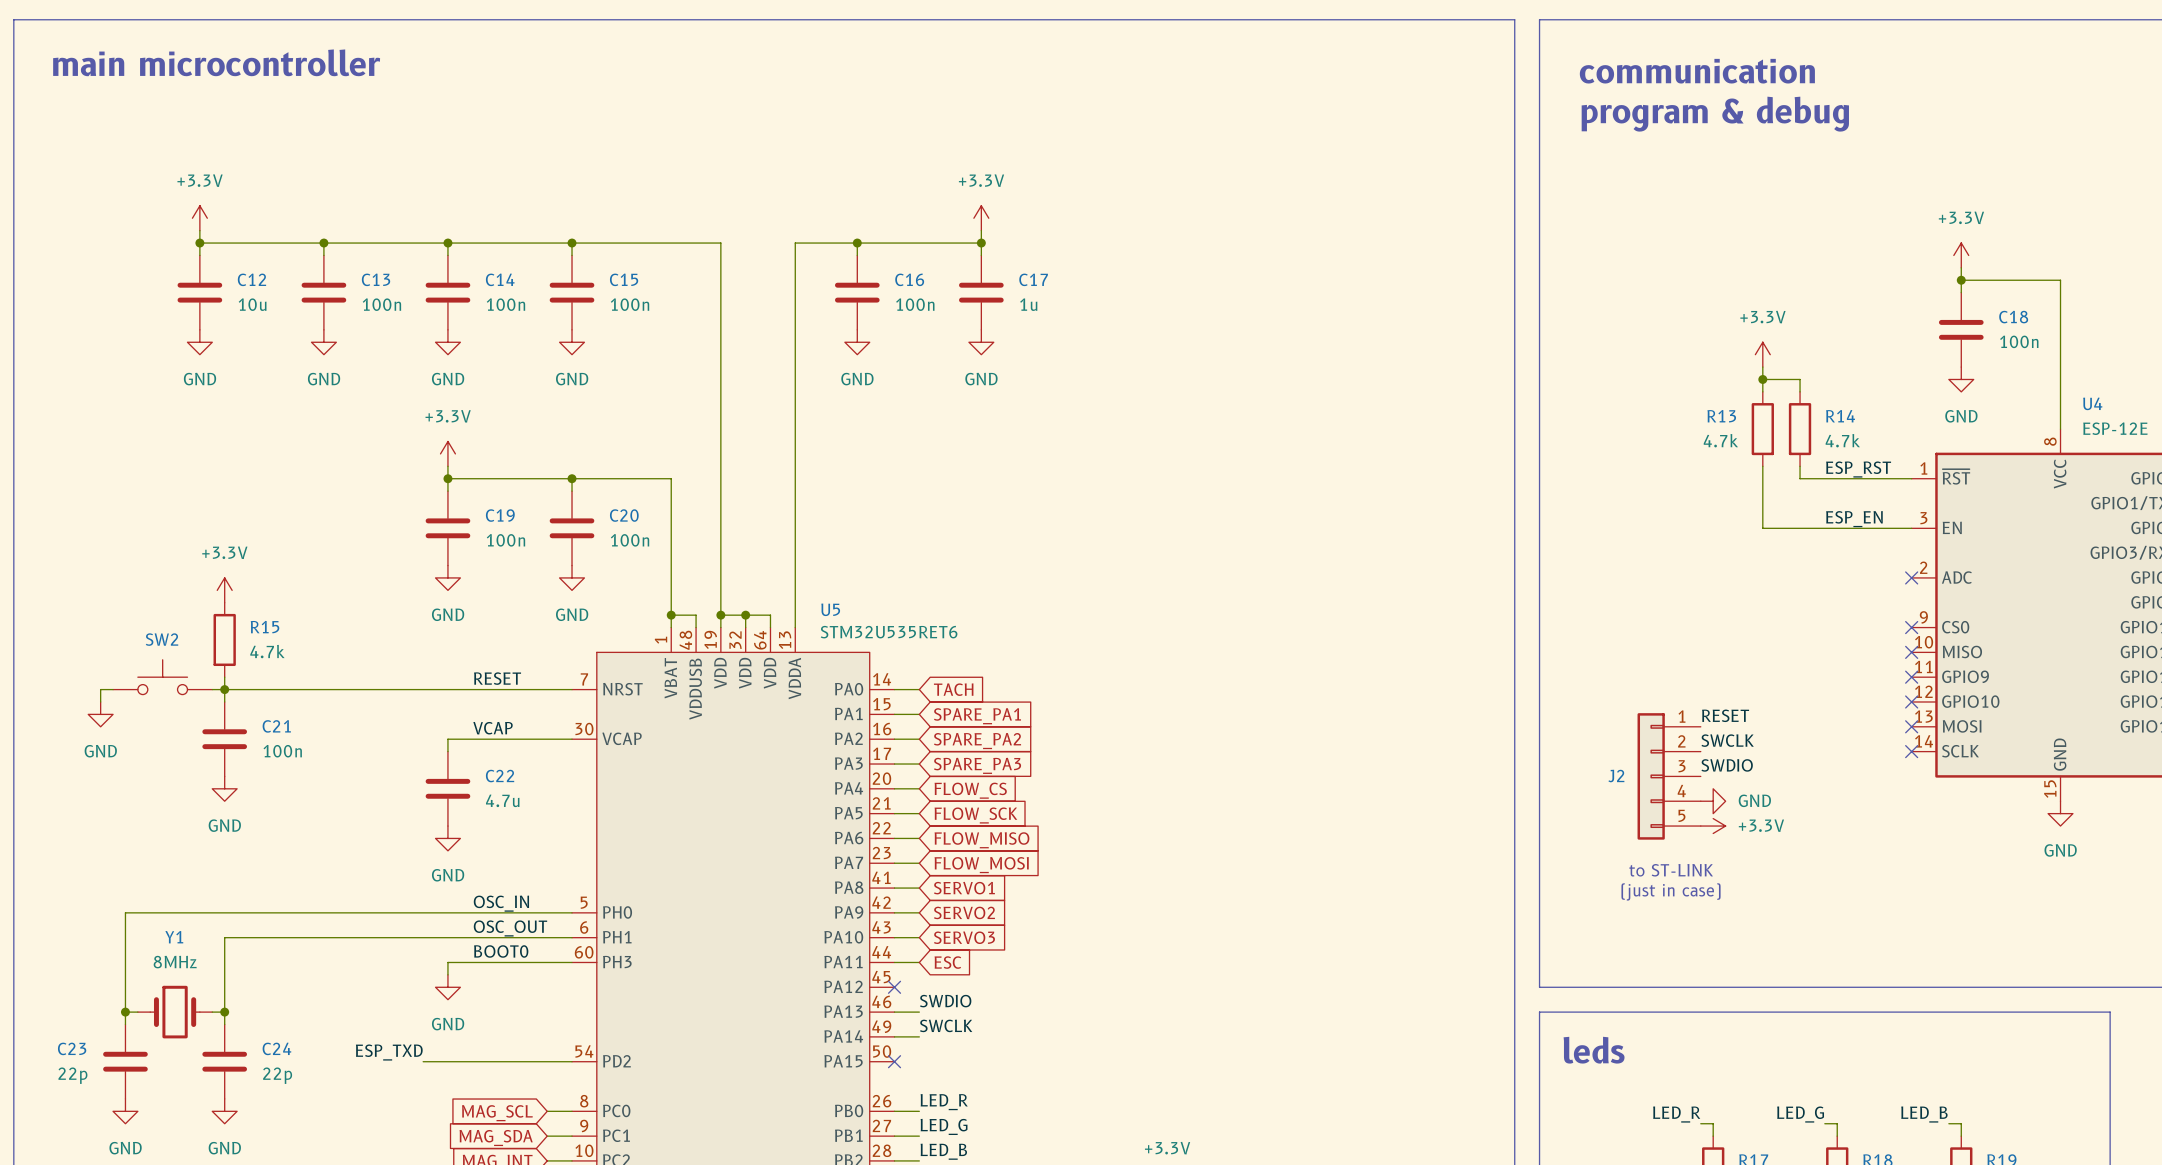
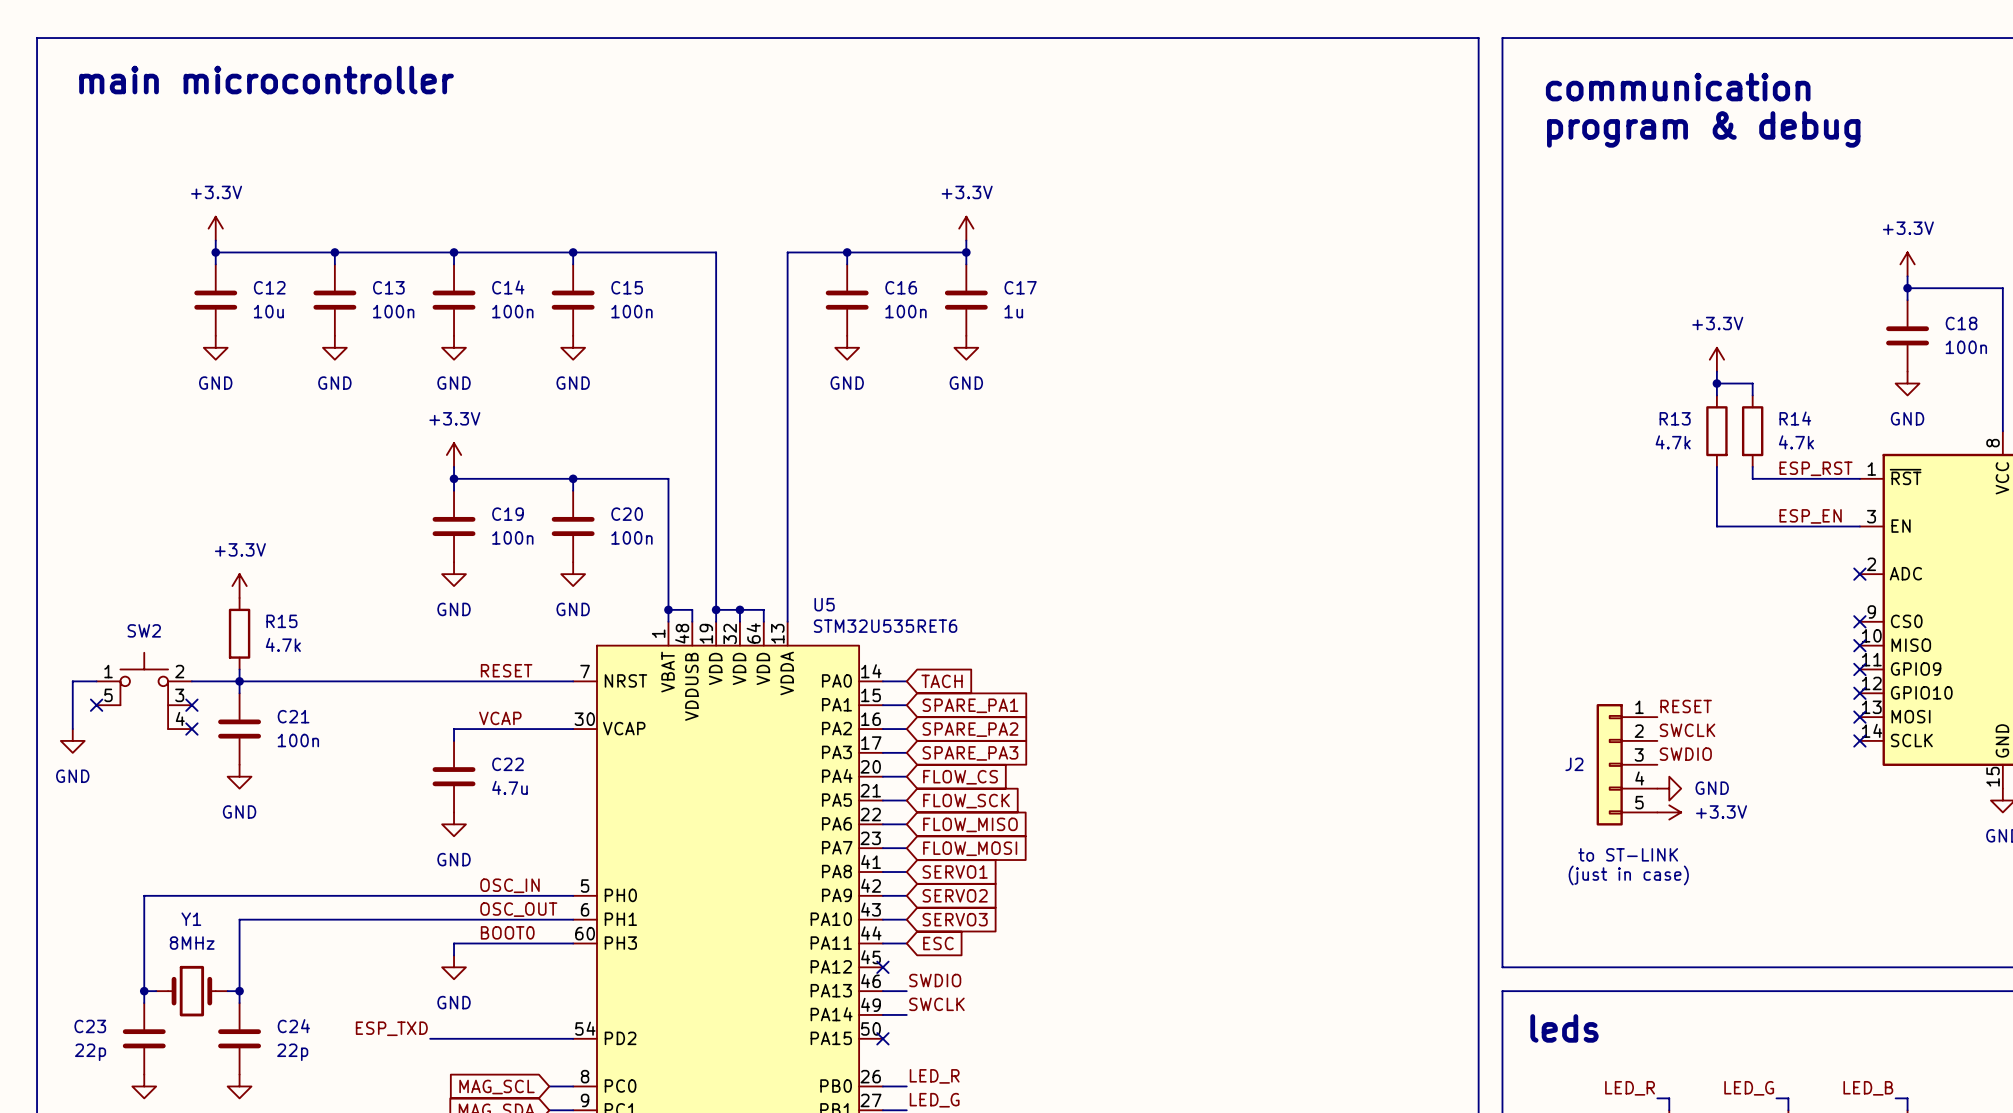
SW2 name position: SW2 (162, 639) -> SW2 (144, 630)
SW2 symbol: [113, 659, 213, 695] -> [96, 652, 192, 730]
wire: none -> (96, 681) (72, 681) (72, 729)
no-connect mark: none -> (96, 705)
power symbol position: GND (100, 714) -> GND (72, 740)
no-connect mark: none -> (191, 705)
no-connect mark: none -> (191, 729)

